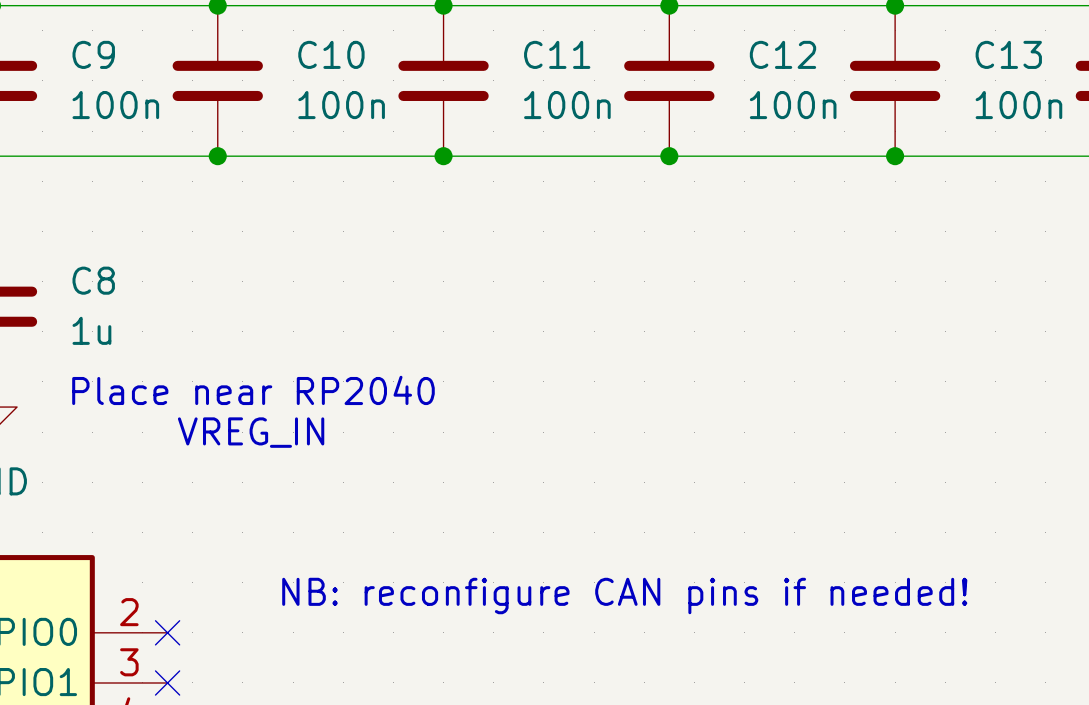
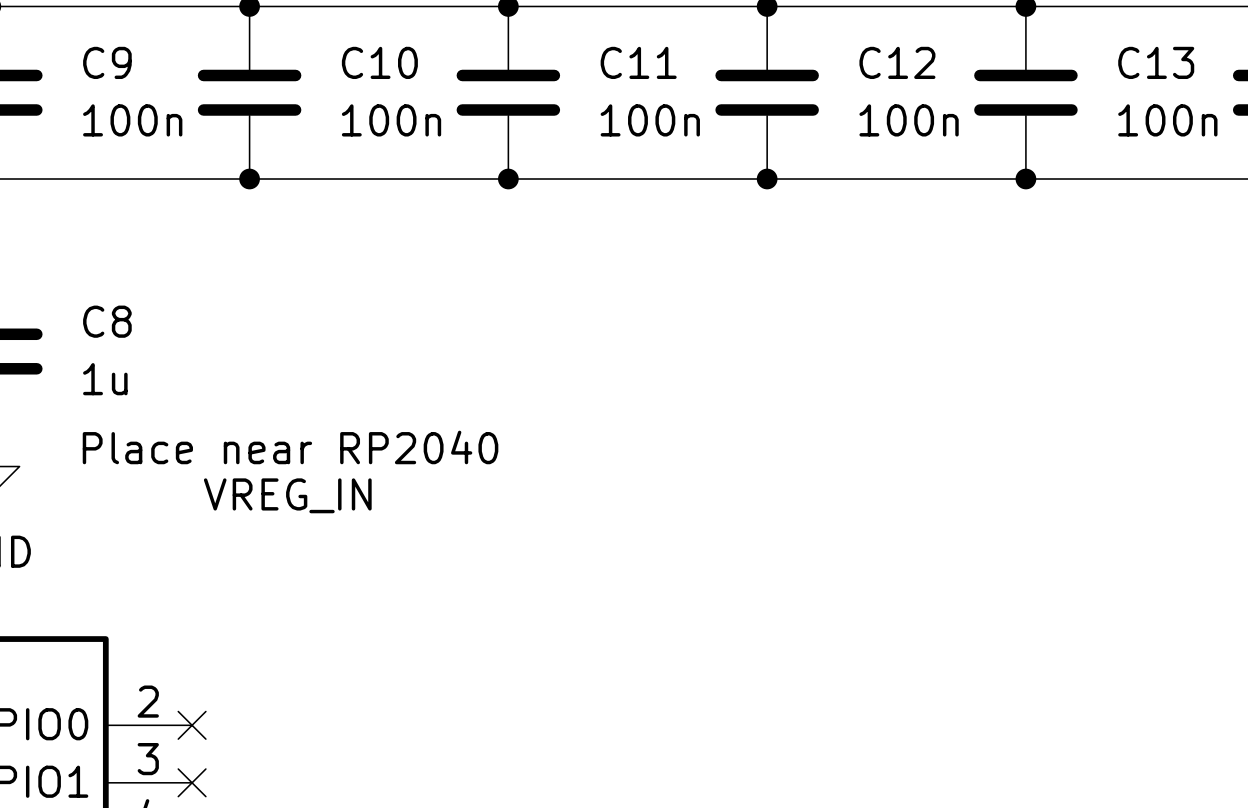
text: NB: reconfigure CAN pins if needed! (624, 596) -> none

